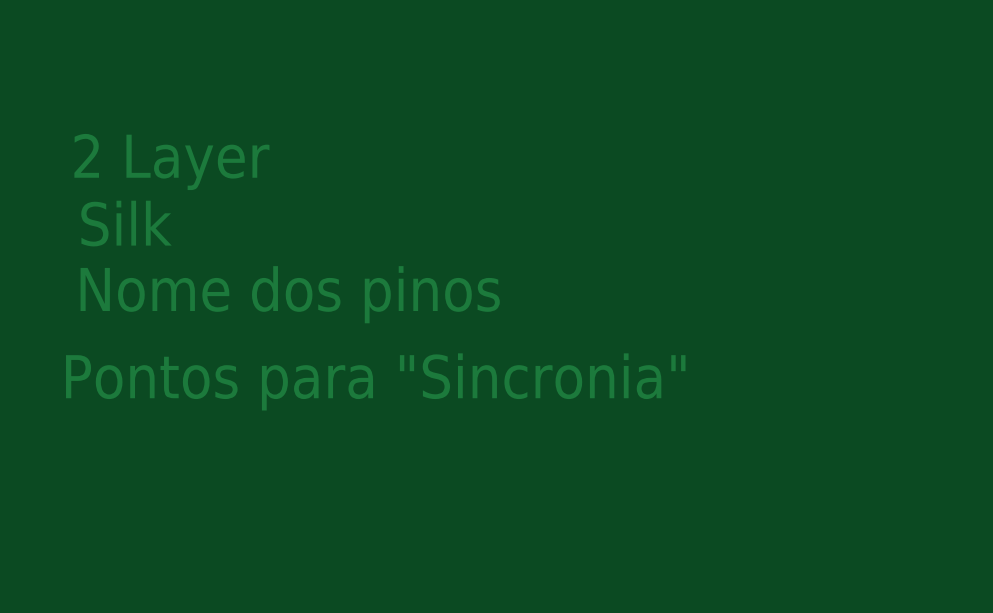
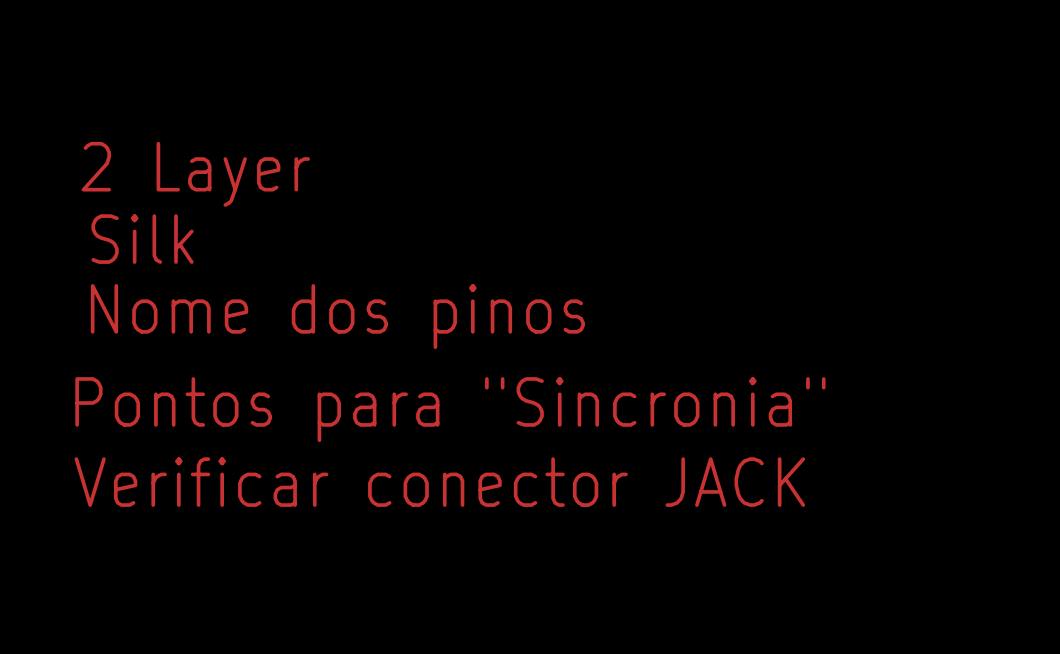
text: none -> Verificar conector JACK (439, 482)

